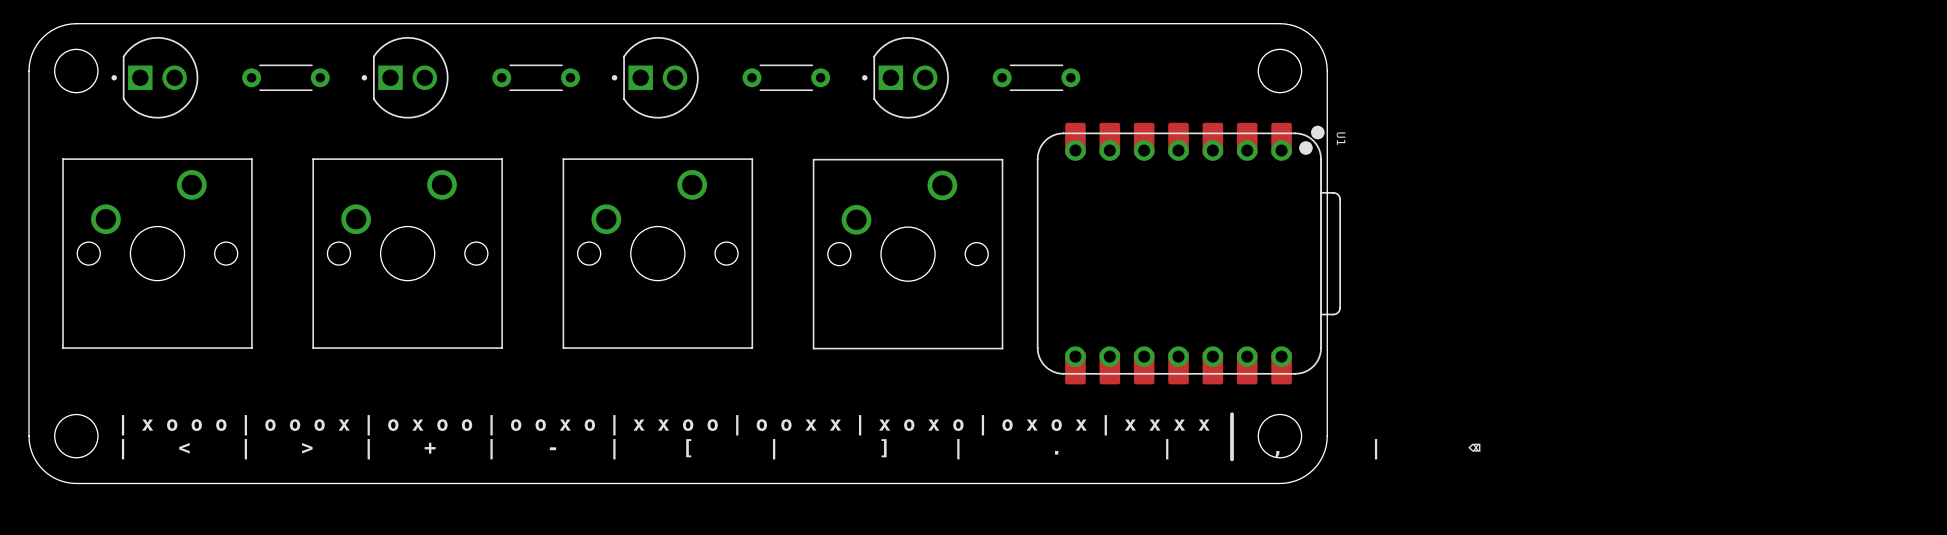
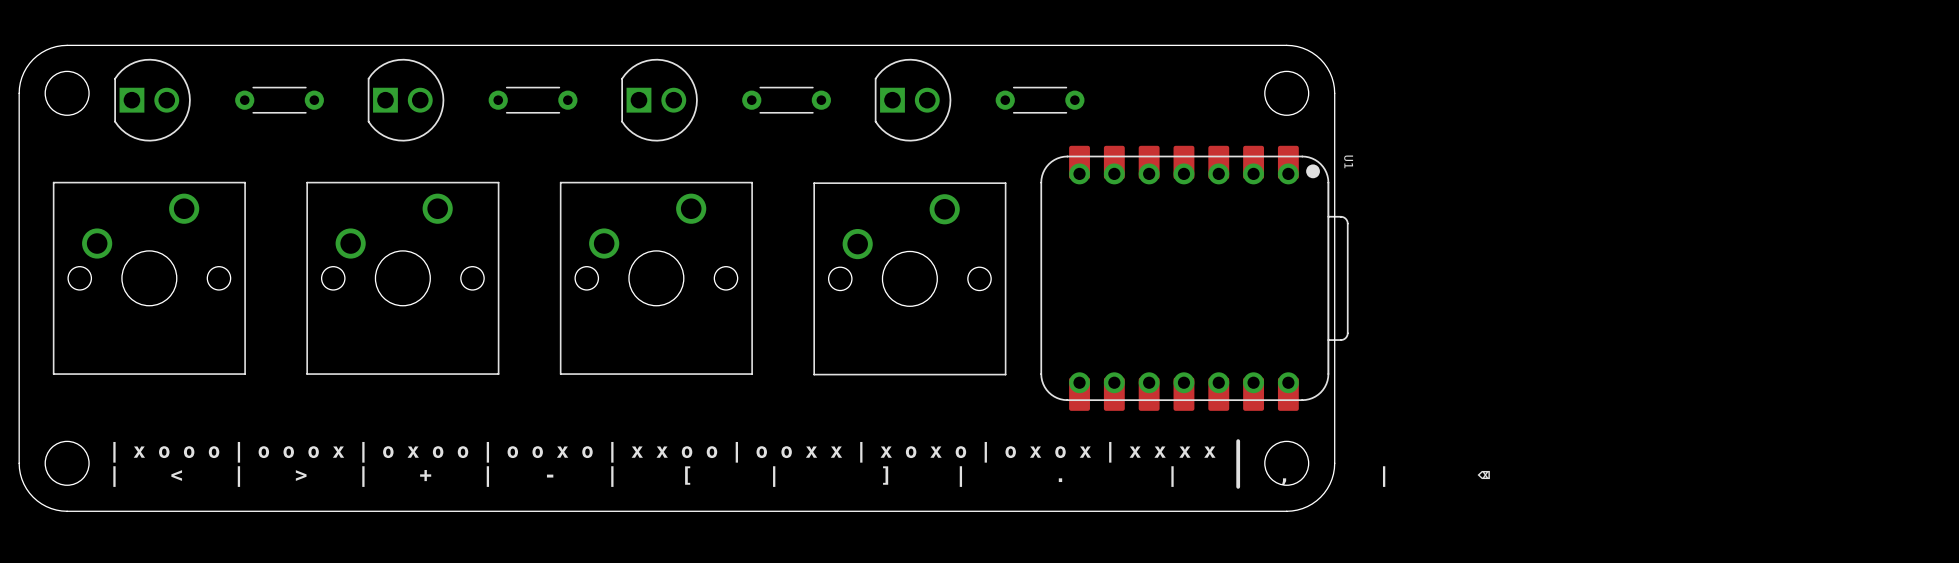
part footprint: [111, 36, 199, 119] -> [114, 58, 191, 142]
part footprint: [361, 36, 449, 119] -> [367, 58, 445, 142]
part footprint: [611, 36, 699, 119] -> [621, 58, 698, 142]
part footprint: [862, 36, 949, 119] -> [874, 58, 952, 142]
U1 footprint: [1036, 122, 1341, 385] -> [1040, 145, 1349, 411]

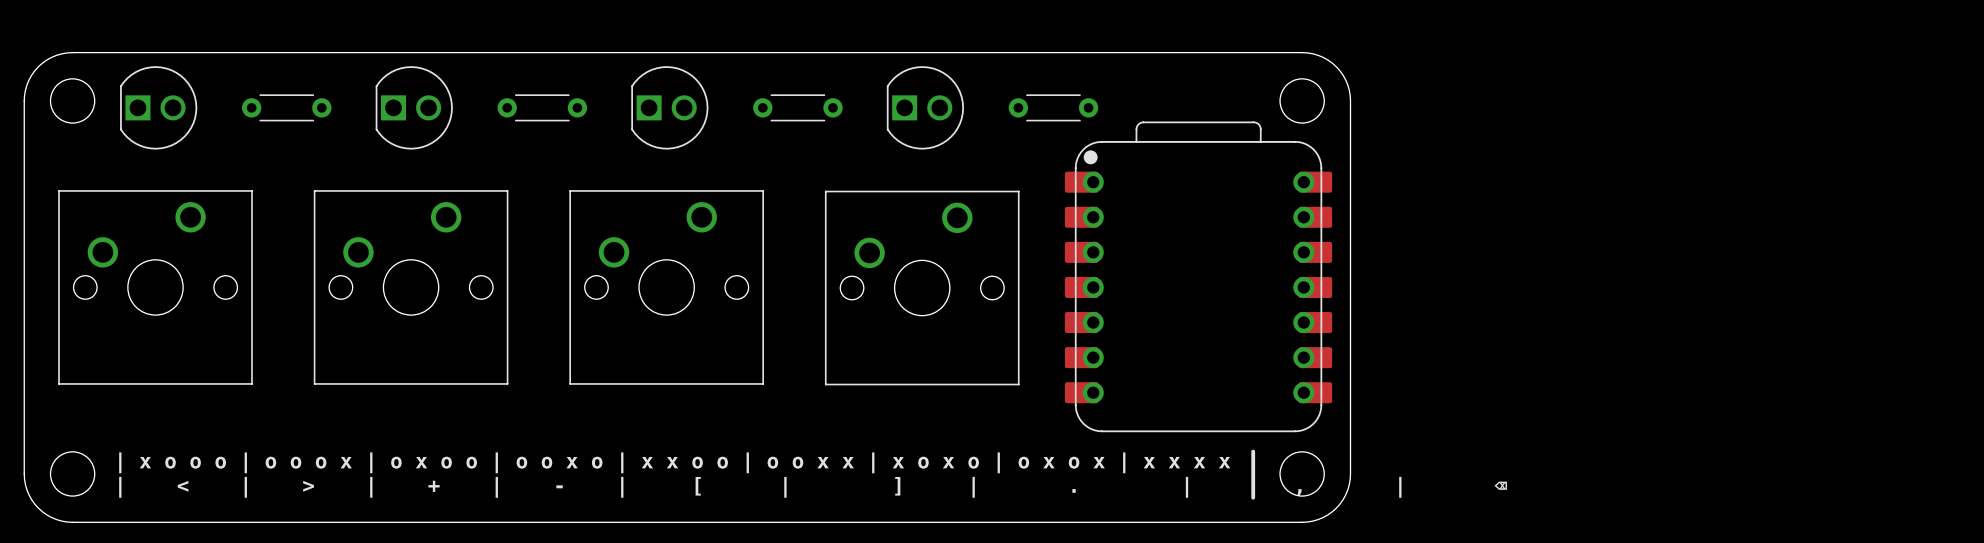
part: none -> (1198, 276)
U1: (1194, 278) -> none

